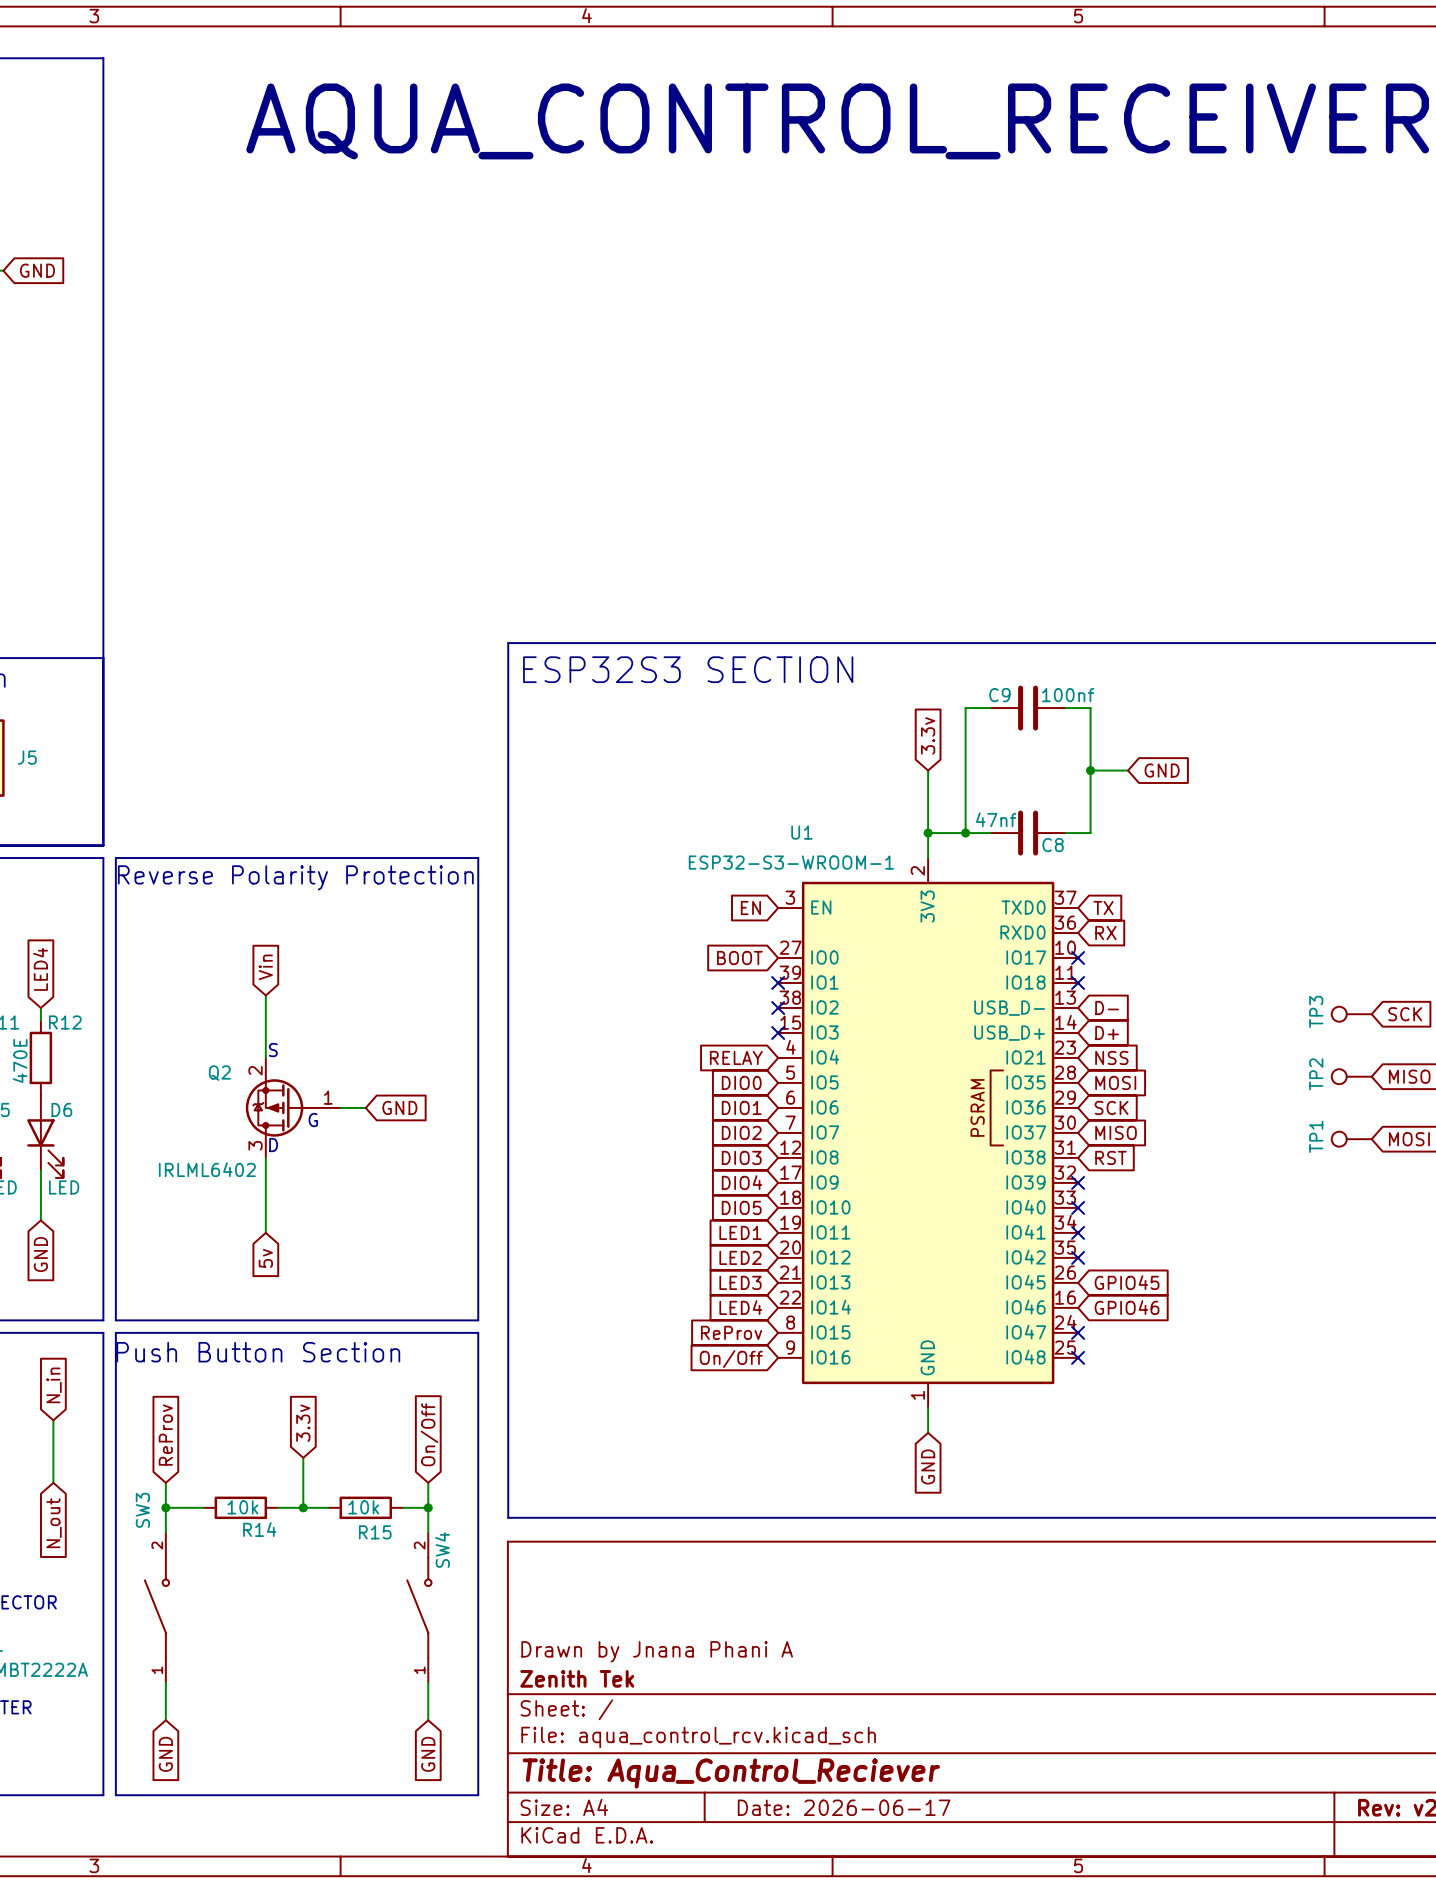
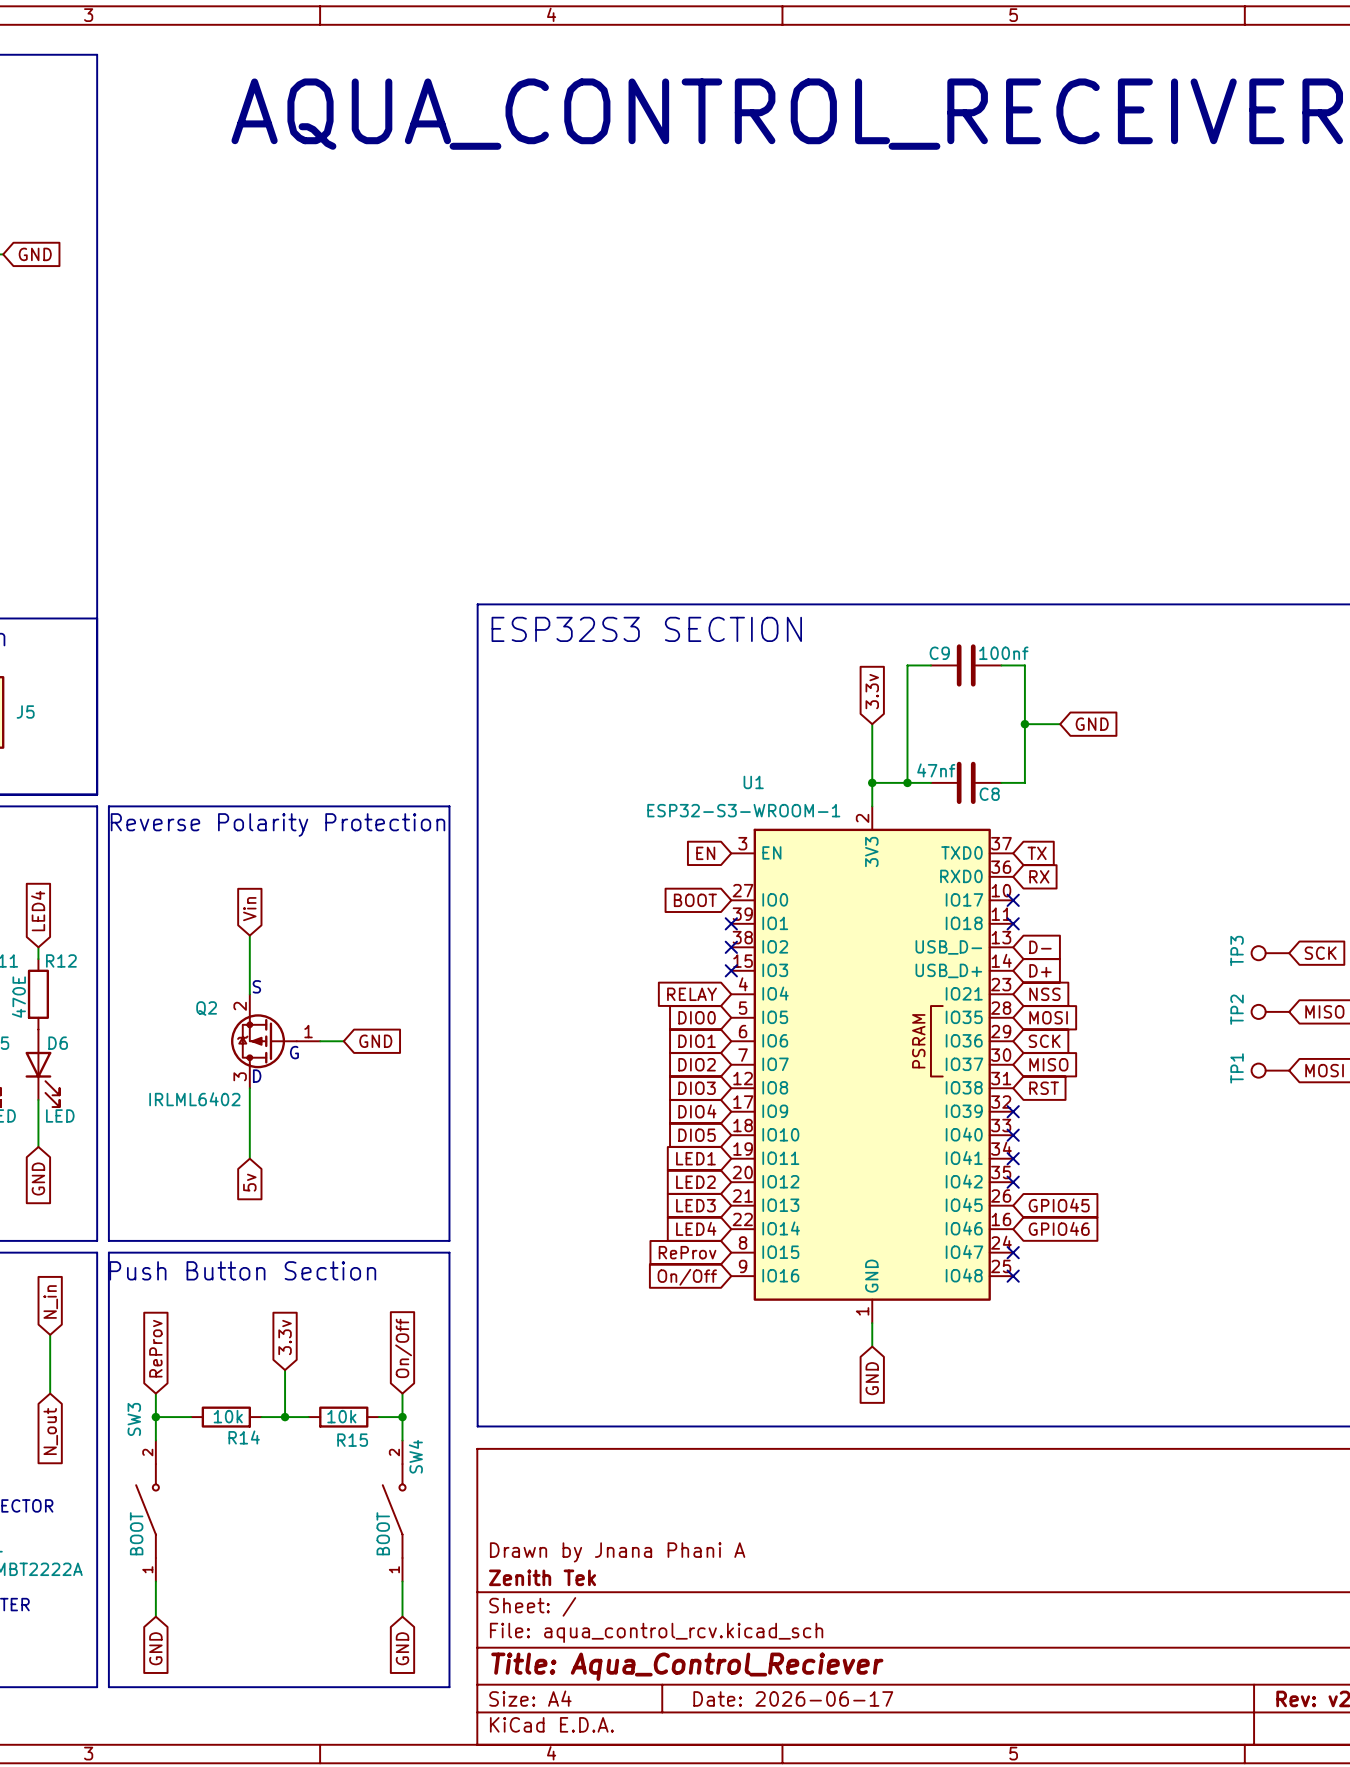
SW3 value: none -> BOOT (136, 1533)
SW4 value: none -> BOOT (383, 1533)

